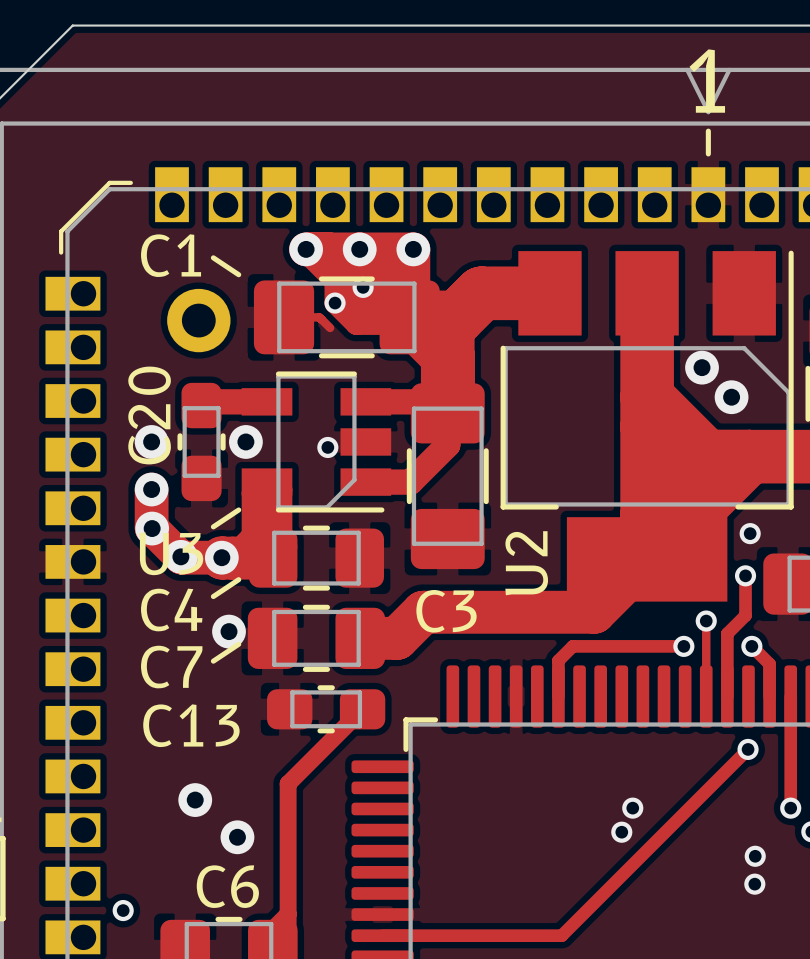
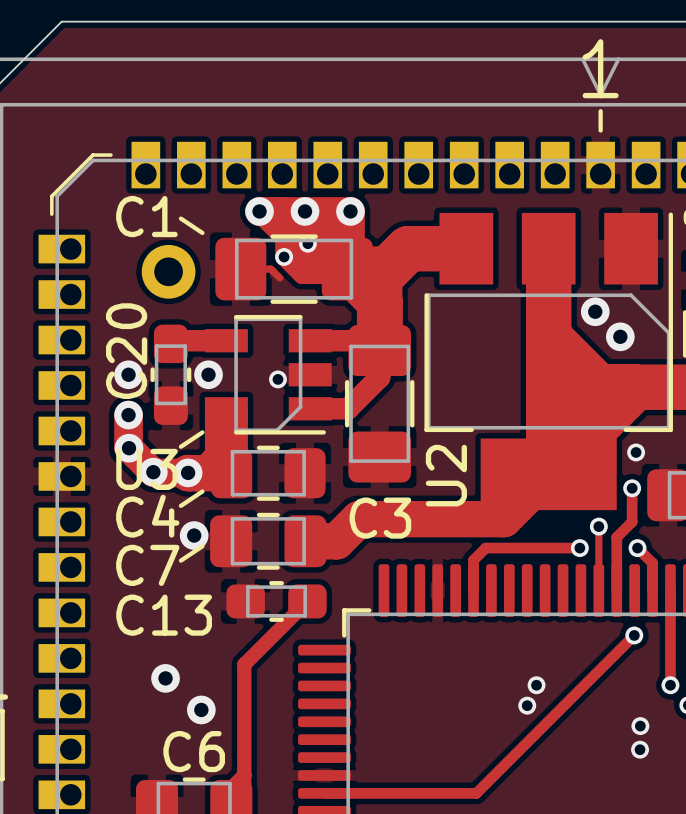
via: (123, 910) -> none

